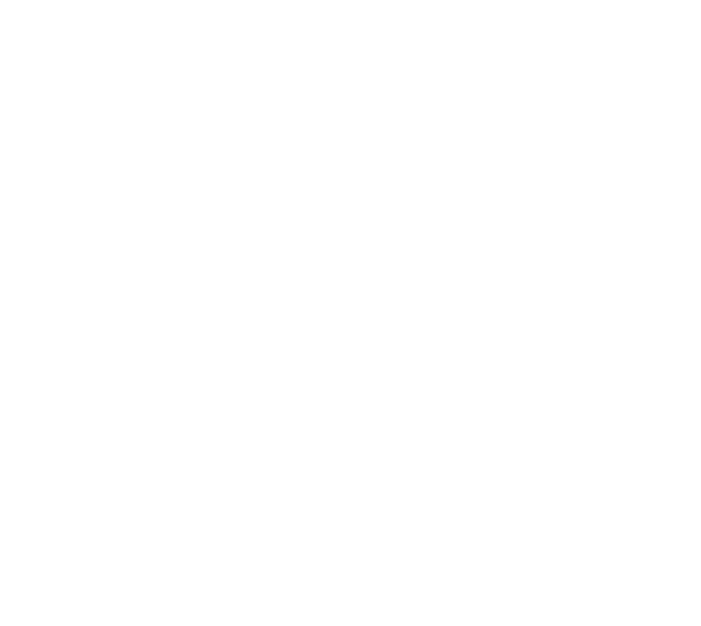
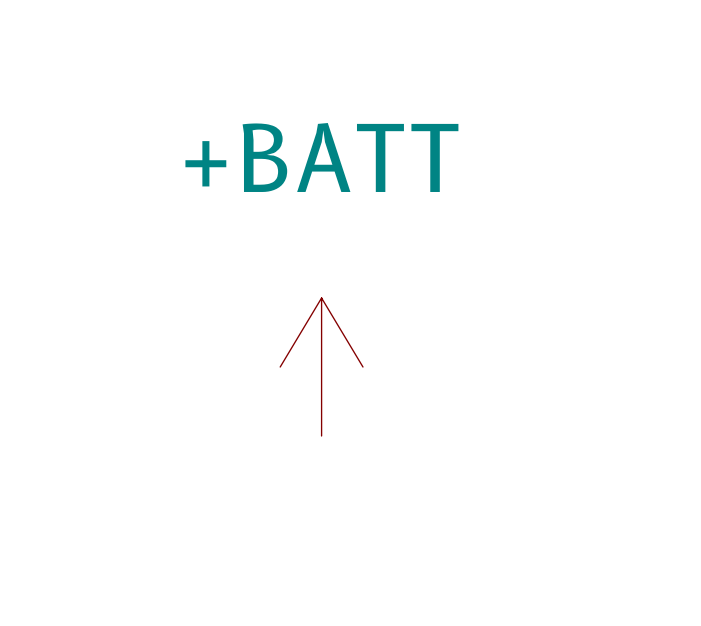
power symbol: none -> +BATT (321, 367)

